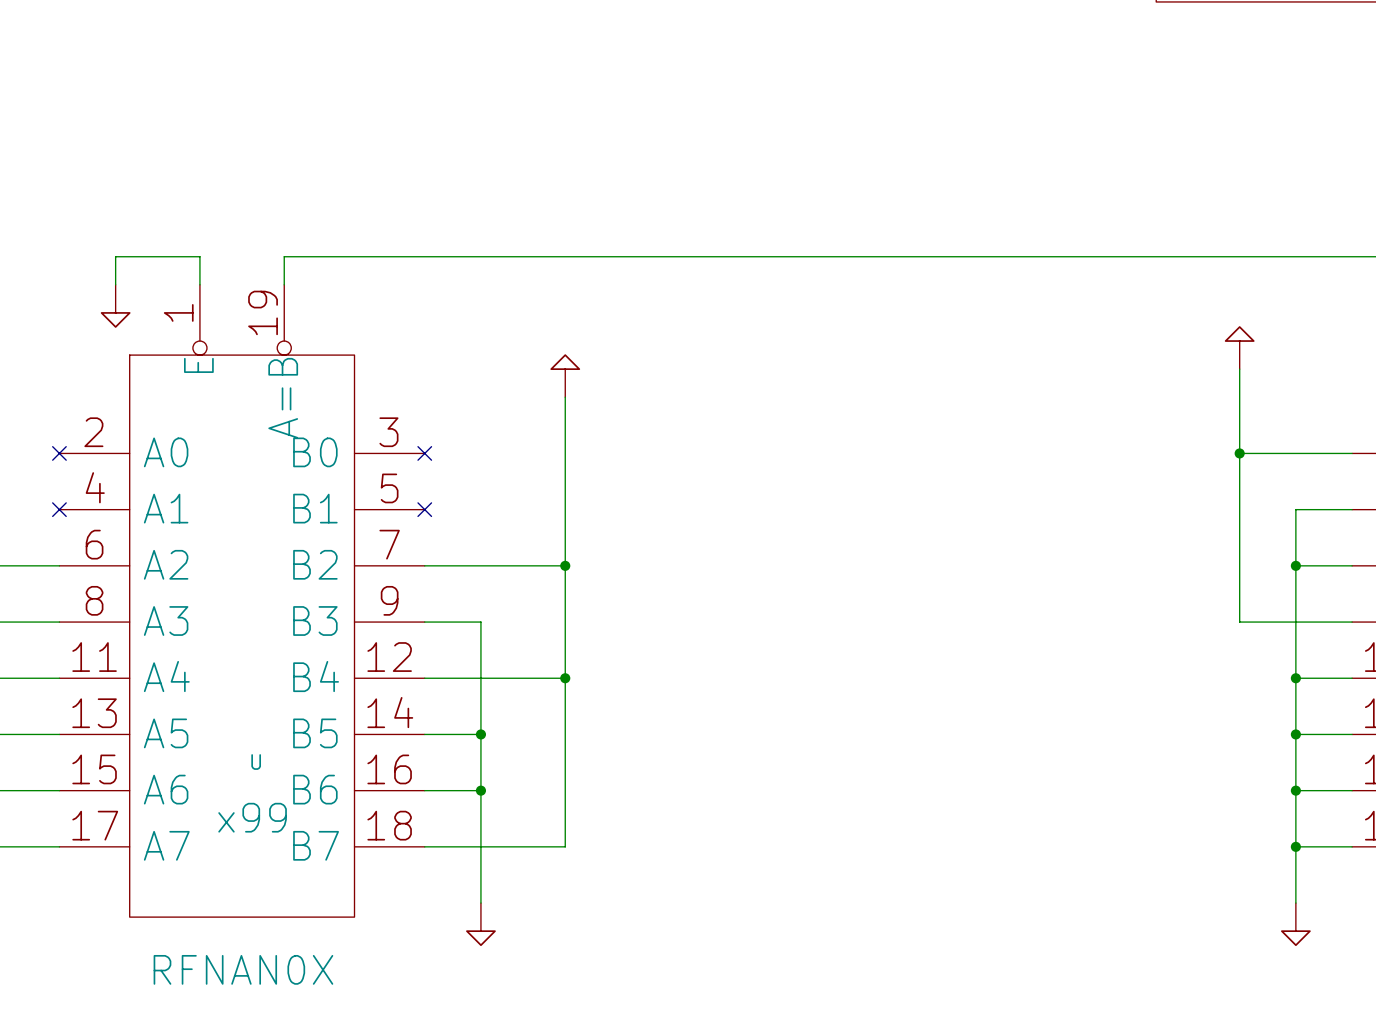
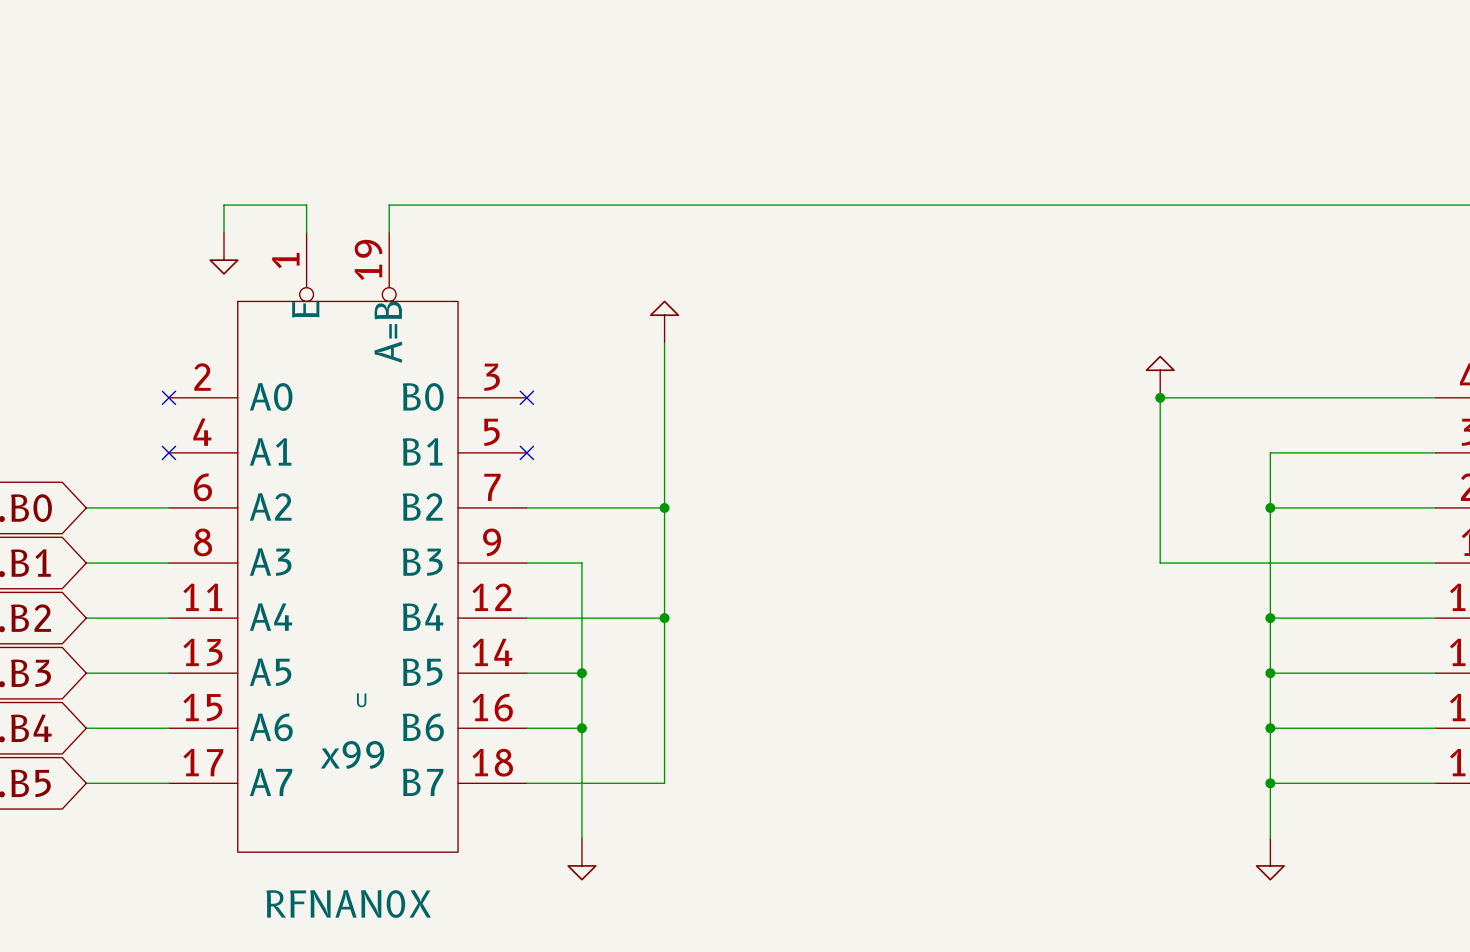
power symbol position: (1239, 347) -> (1160, 376)
wire: (1239, 369) (1239, 622) -> (1325, 397) (1160, 397) (1160, 563) (1325, 563)
junction: none -> (1160, 397)
junction: (1239, 453) -> none
wire: (1295, 509) (1295, 903) -> (1380, 452) (1270, 452) (1270, 838)
wire: none -> (1270, 507) (1380, 507)
junction: none -> (1270, 507)
junction: (1295, 565) -> none
wire: none -> (1270, 618) (1380, 618)
junction: none -> (1270, 618)
junction: (1295, 678) -> none
wire: none -> (1270, 673) (1380, 673)
junction: none -> (1270, 673)
junction: (1295, 734) -> none
wire: none -> (1270, 728) (1380, 728)
junction: none -> (1270, 728)
junction: (1295, 790) -> none
wire: none -> (1270, 783) (1380, 783)
junction: none -> (1270, 783)
junction: (1295, 846) -> none
power symbol position: (1295, 924) -> (1270, 859)

